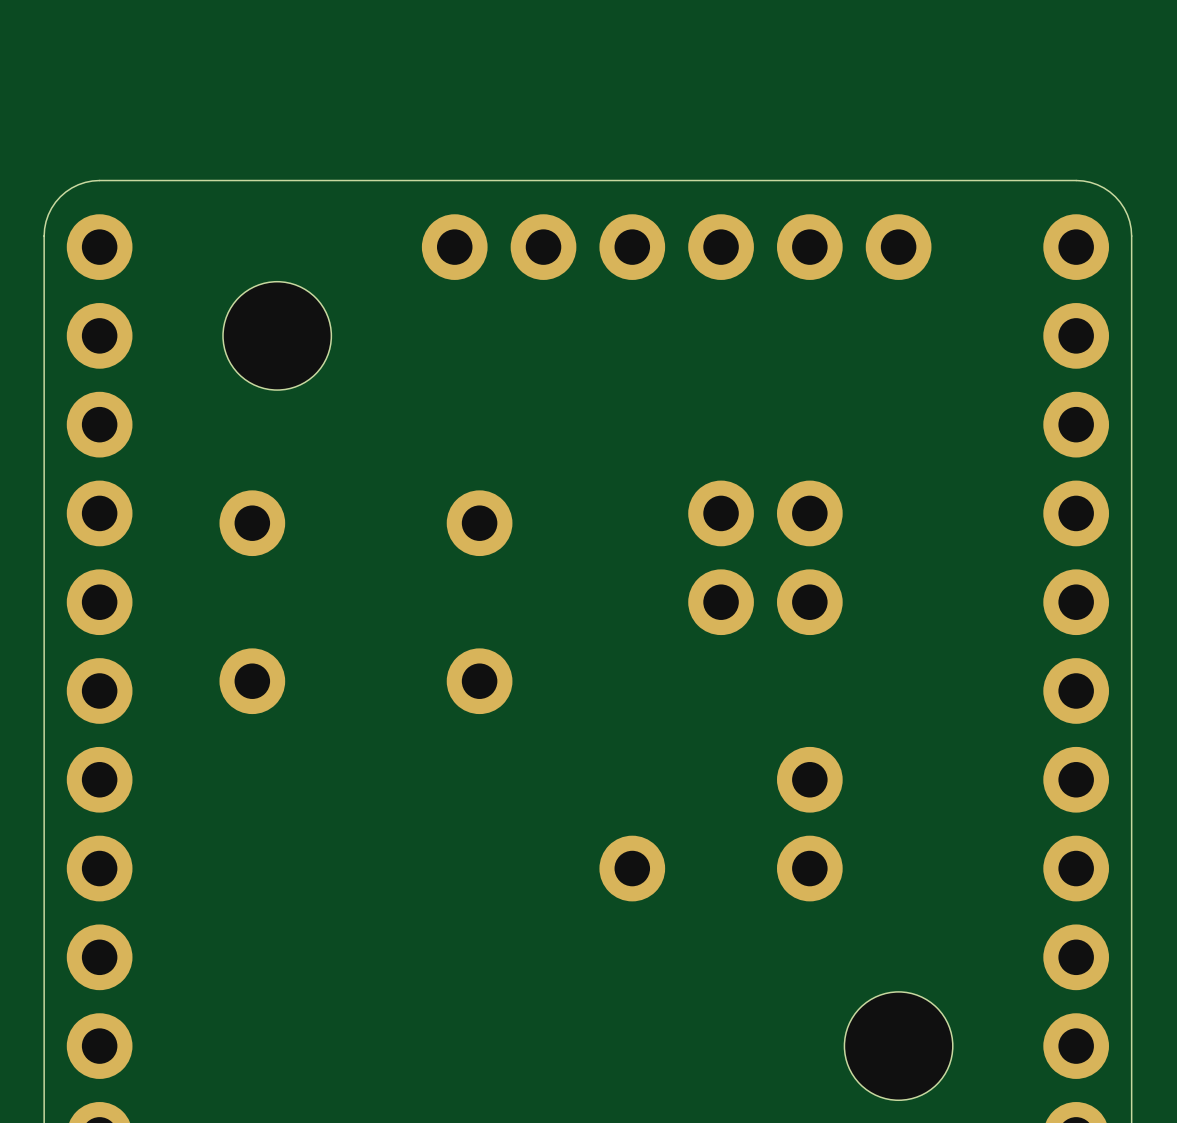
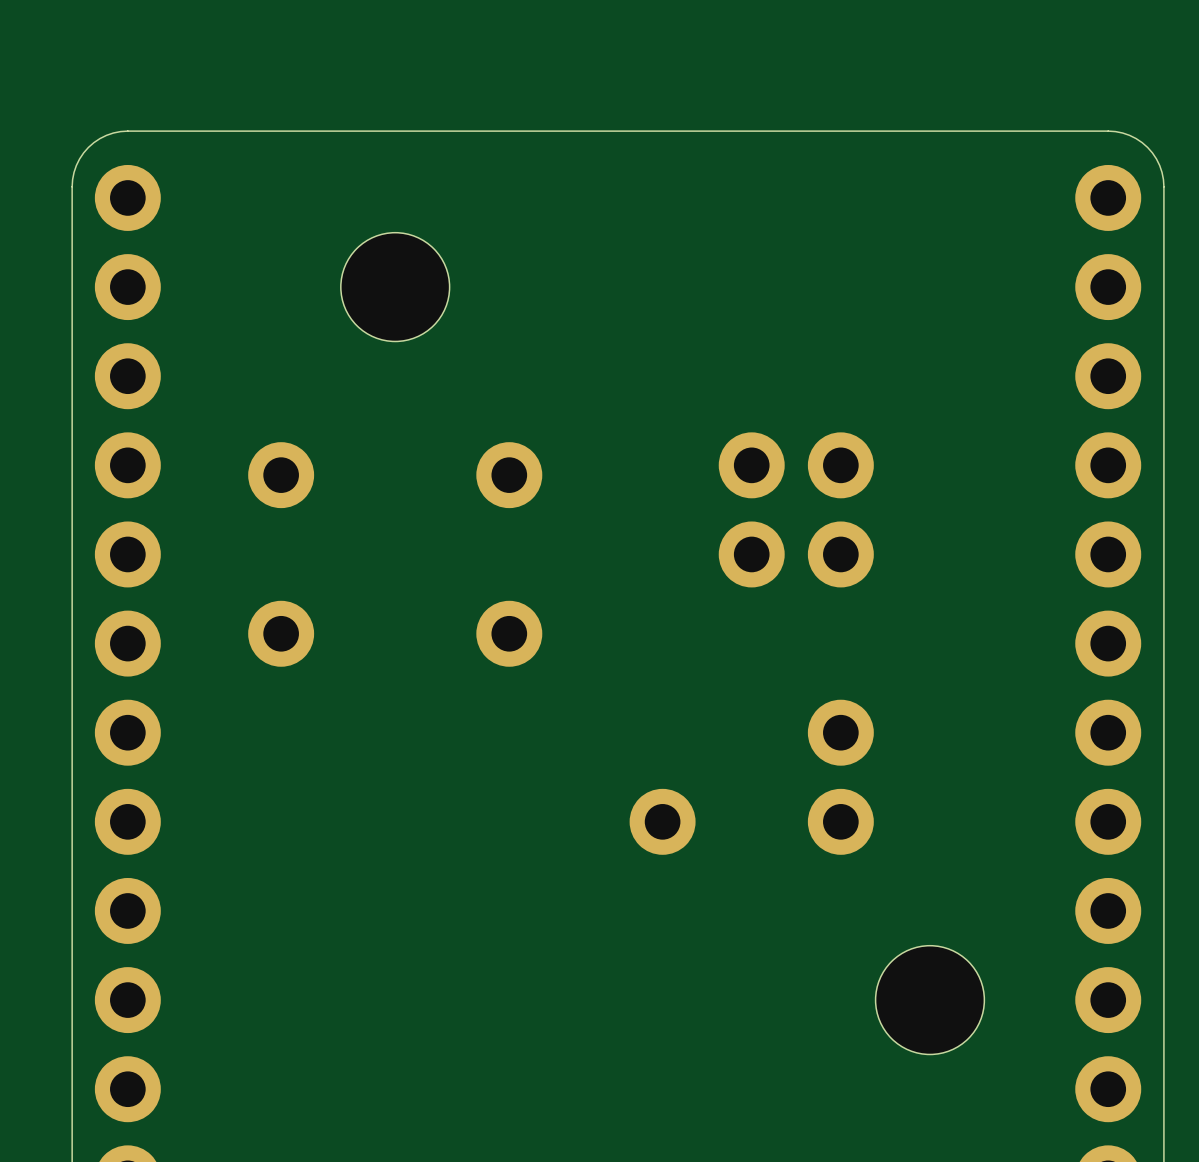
part: (676, 247) -> none
hole position: (277, 335) -> (395, 287)

